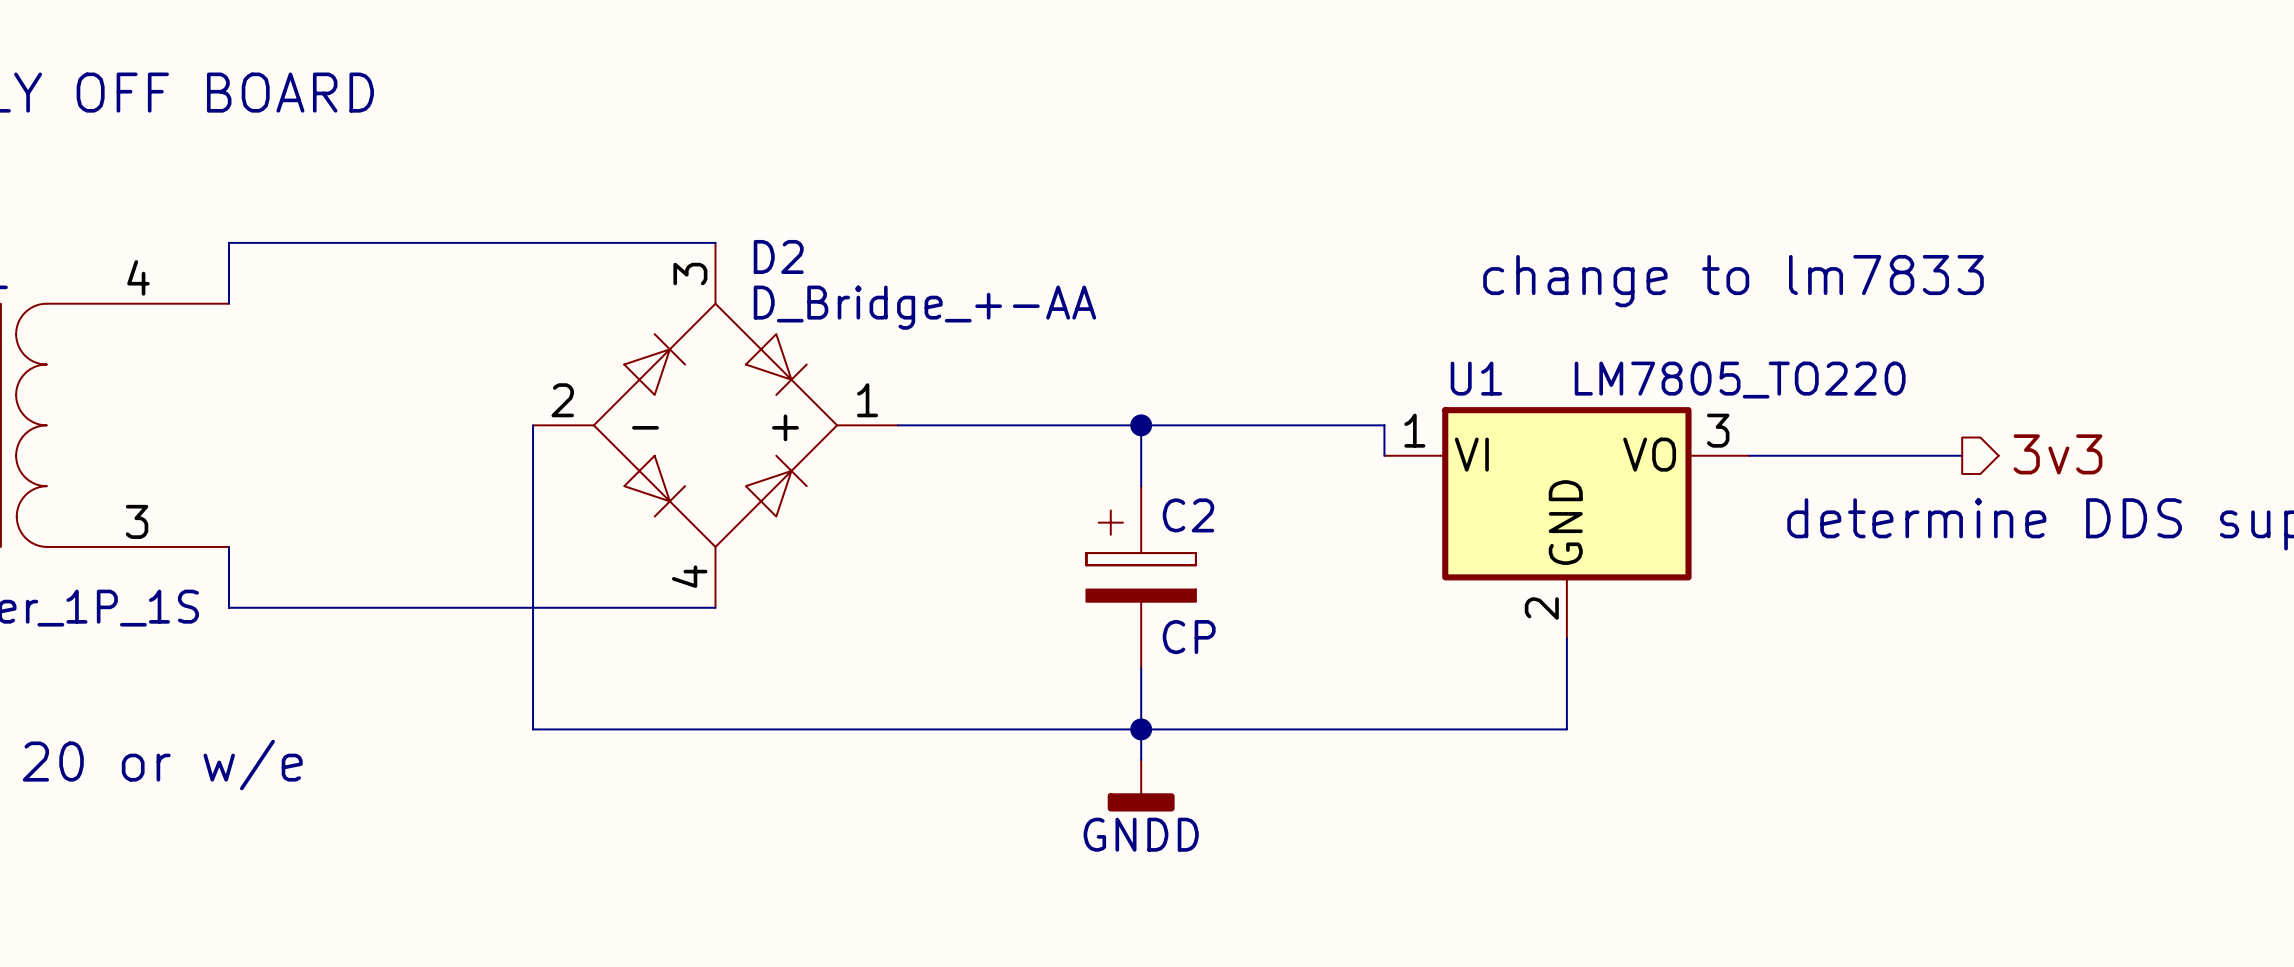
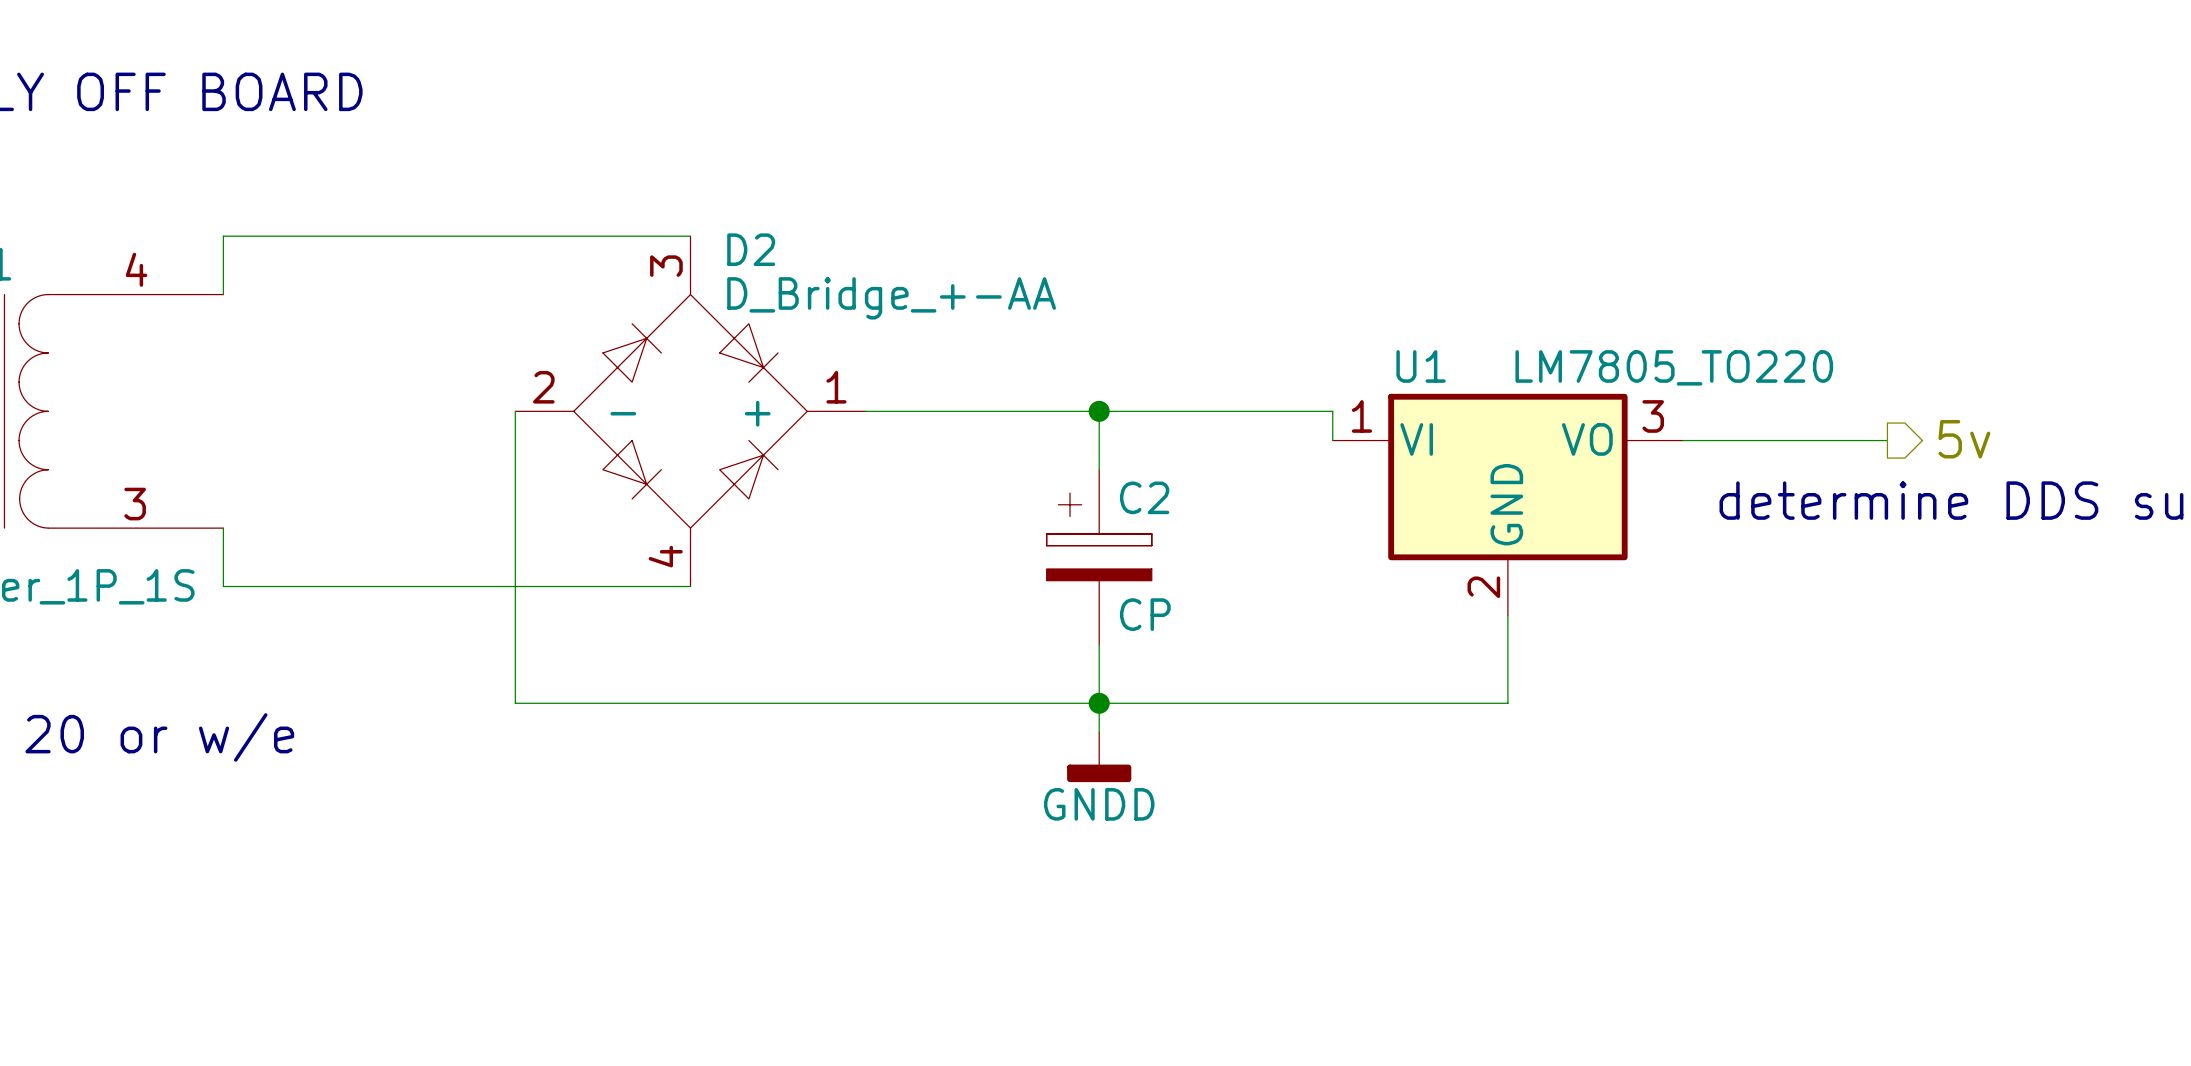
text: change to lm7833 (1733, 281) -> none
hierarchical label: 3v3 (2057, 454) -> 5v (1964, 439)

